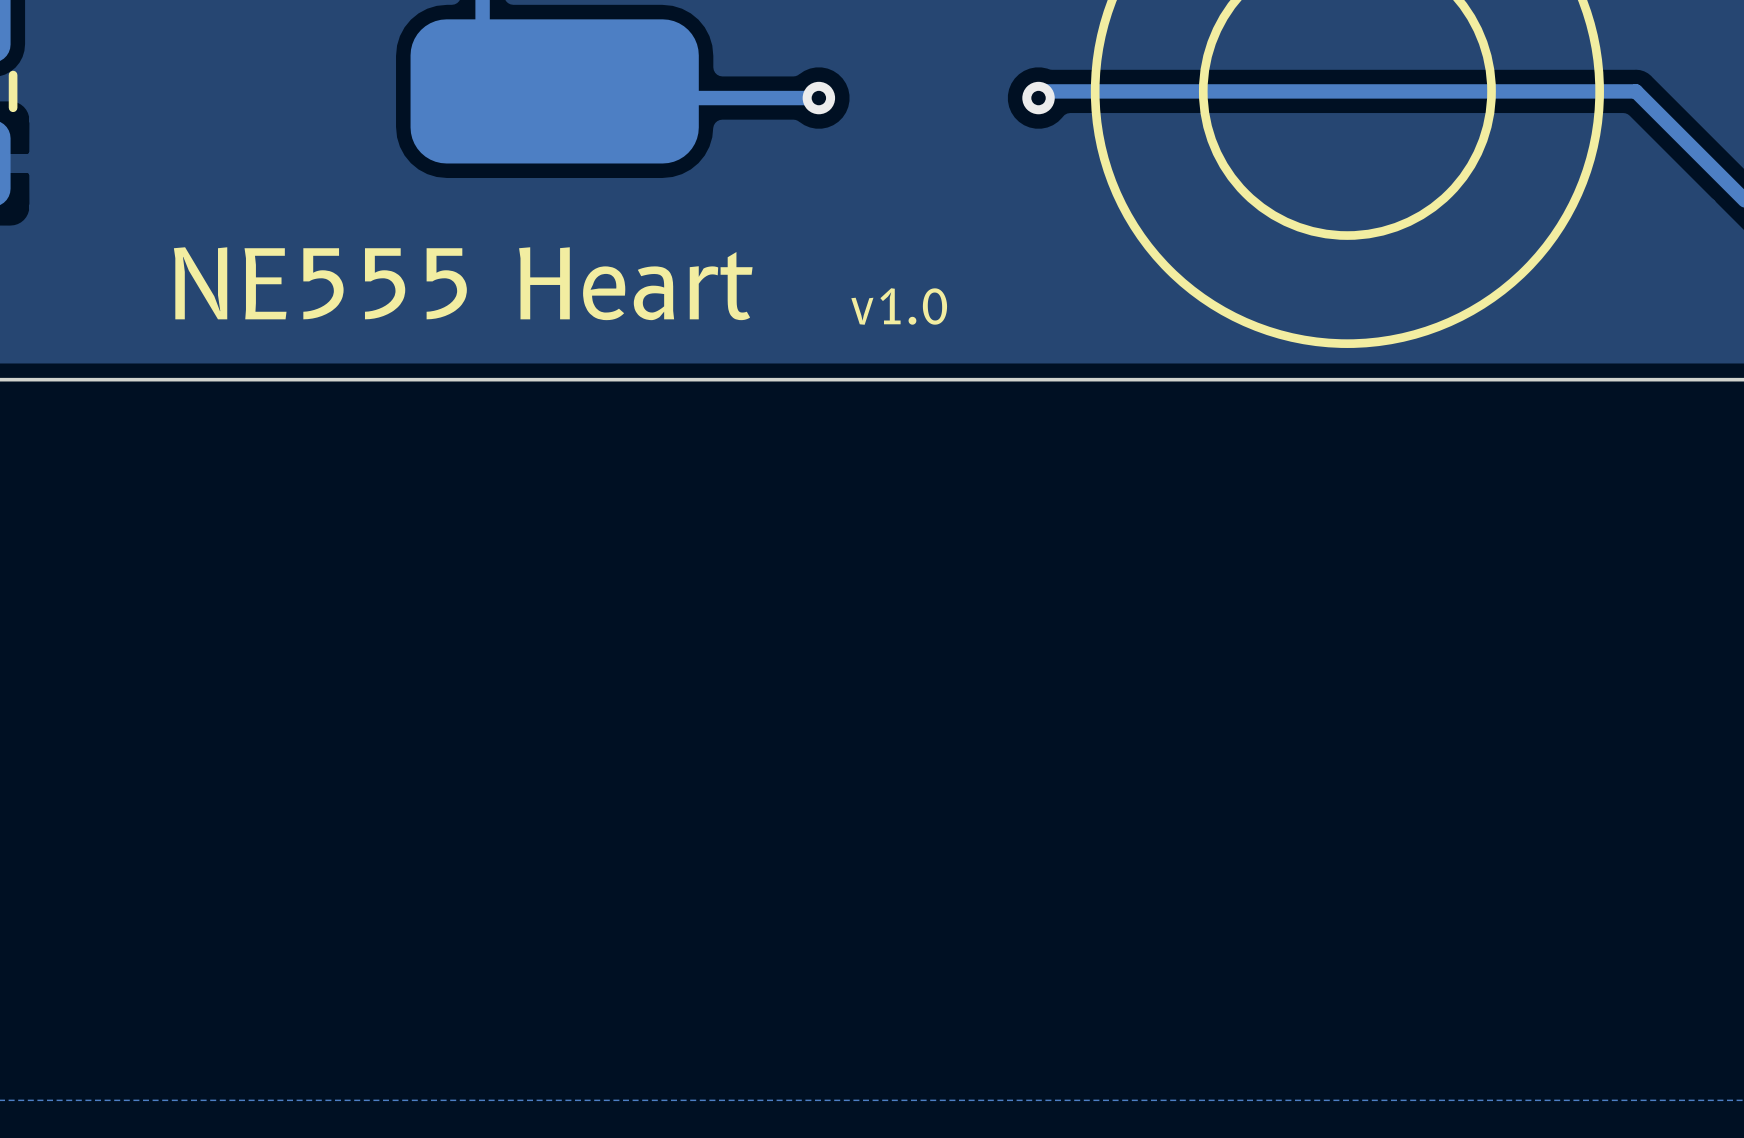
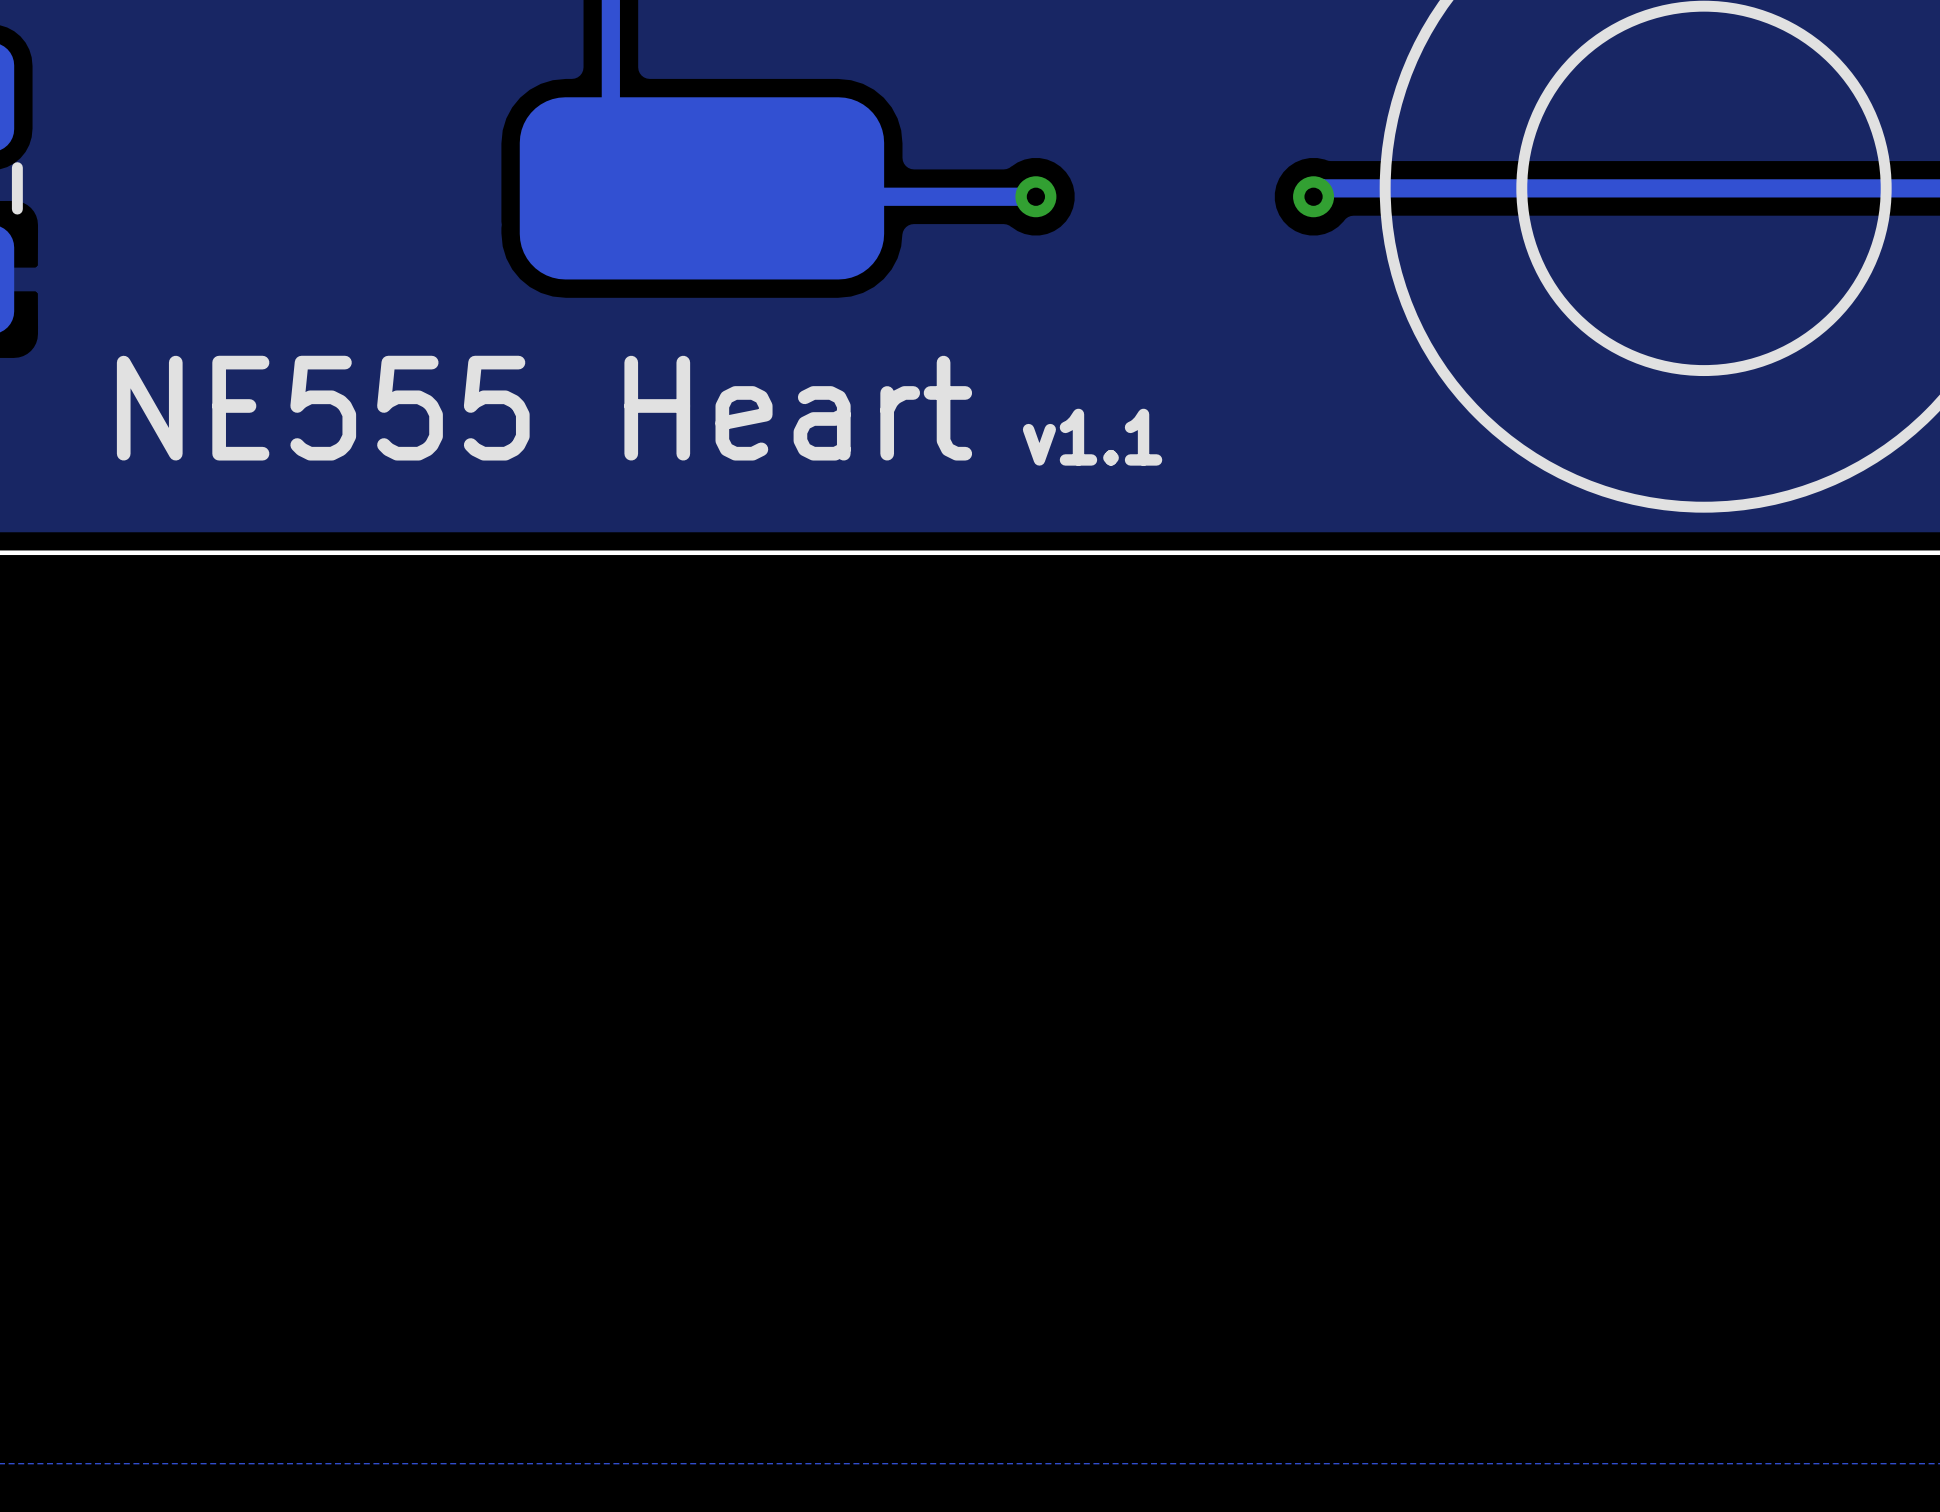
text position: NE555 Heart (463, 283) -> NE555 Heart (544, 408)
text: v1.0 (899, 306) -> v1.1 (1092, 437)

